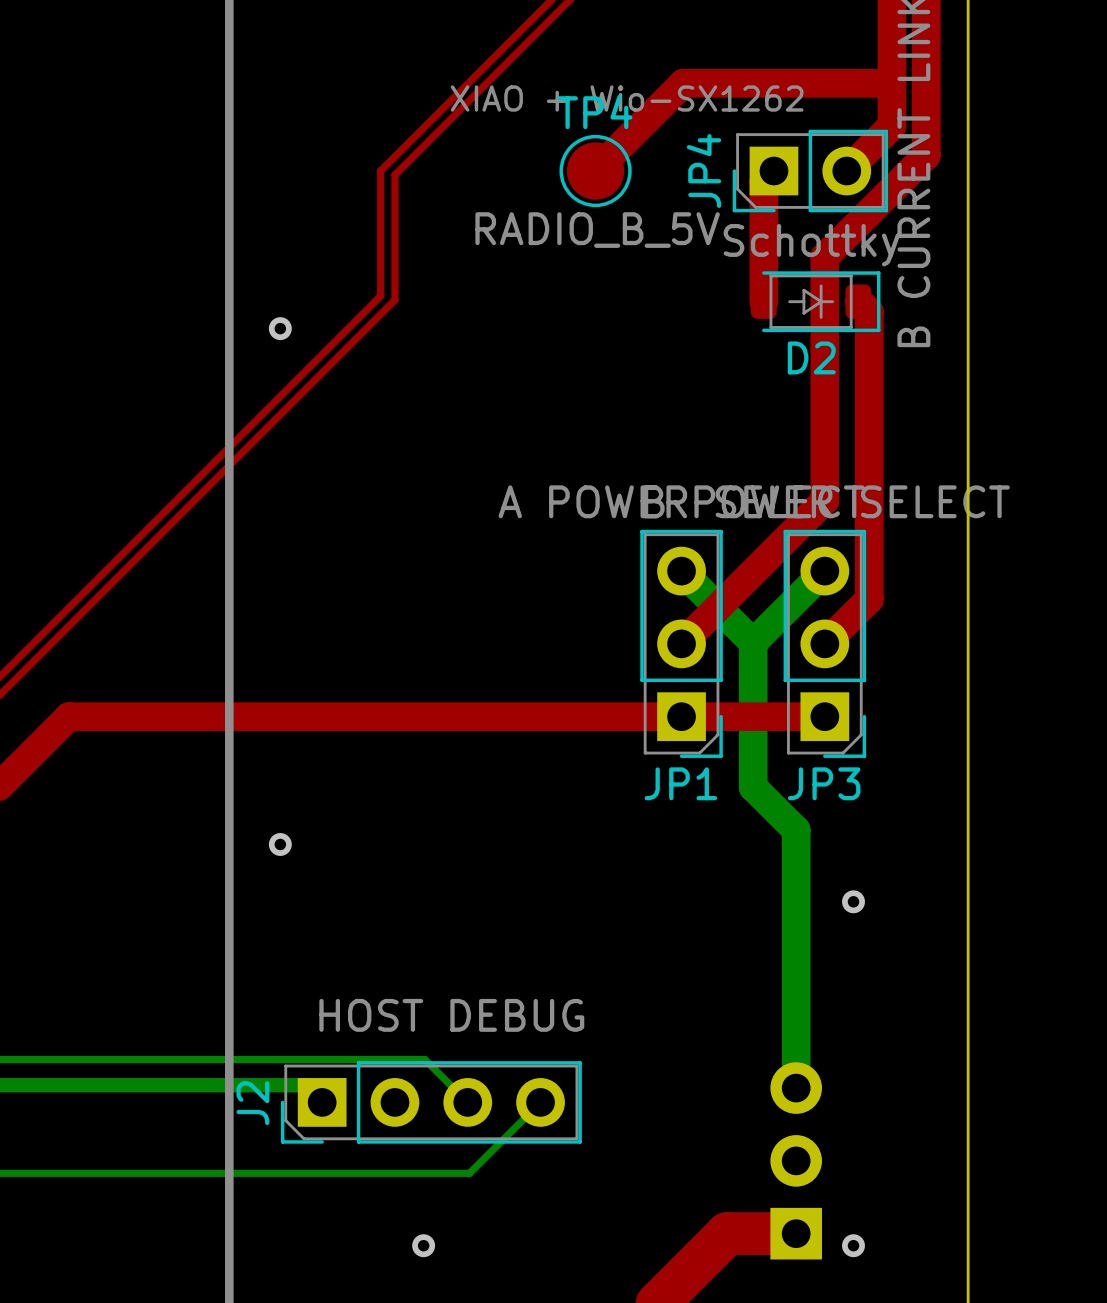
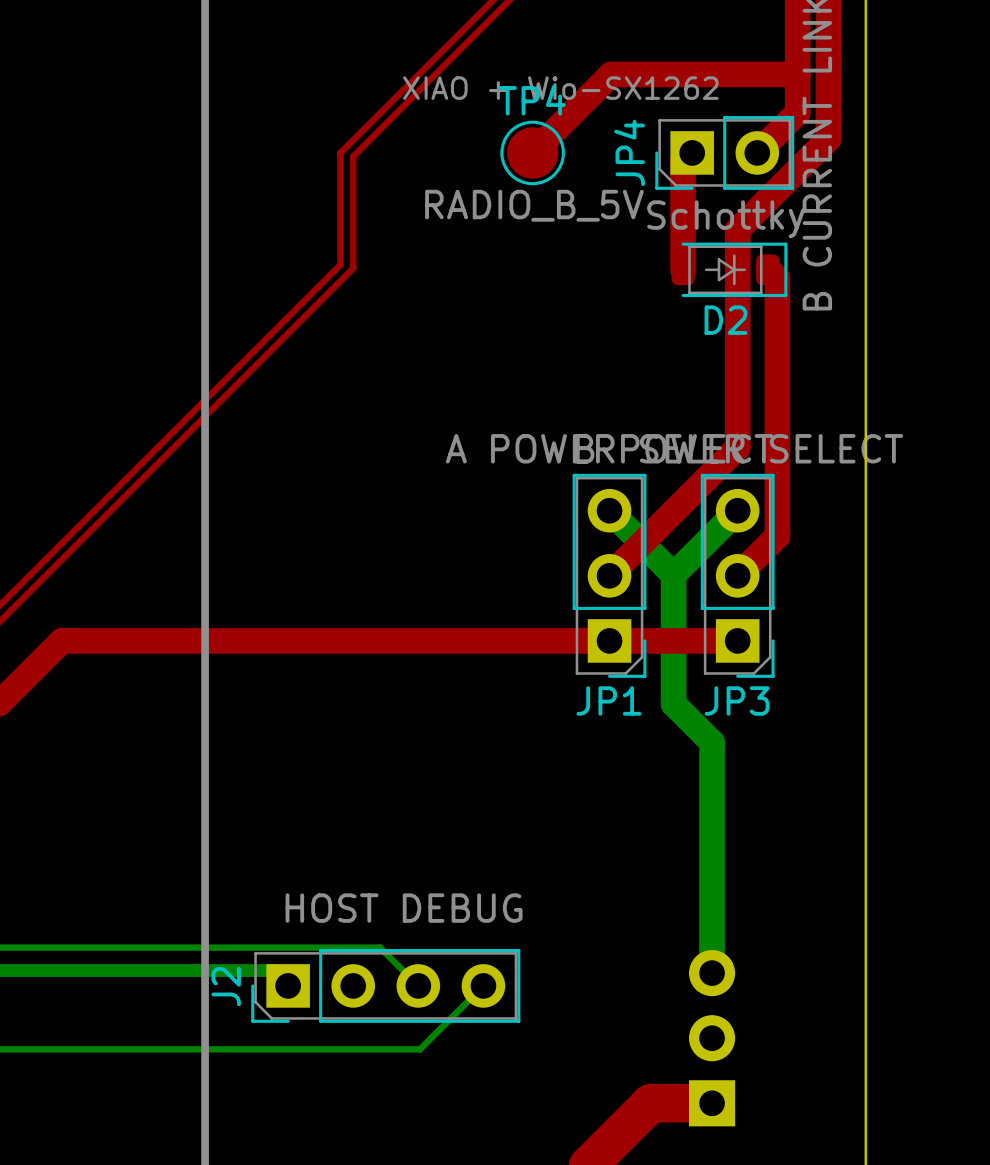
via: (280, 328) -> none
via: (280, 844) -> none
via: (853, 901) -> none
via: (423, 1245) -> none
via: (853, 1245) -> none

